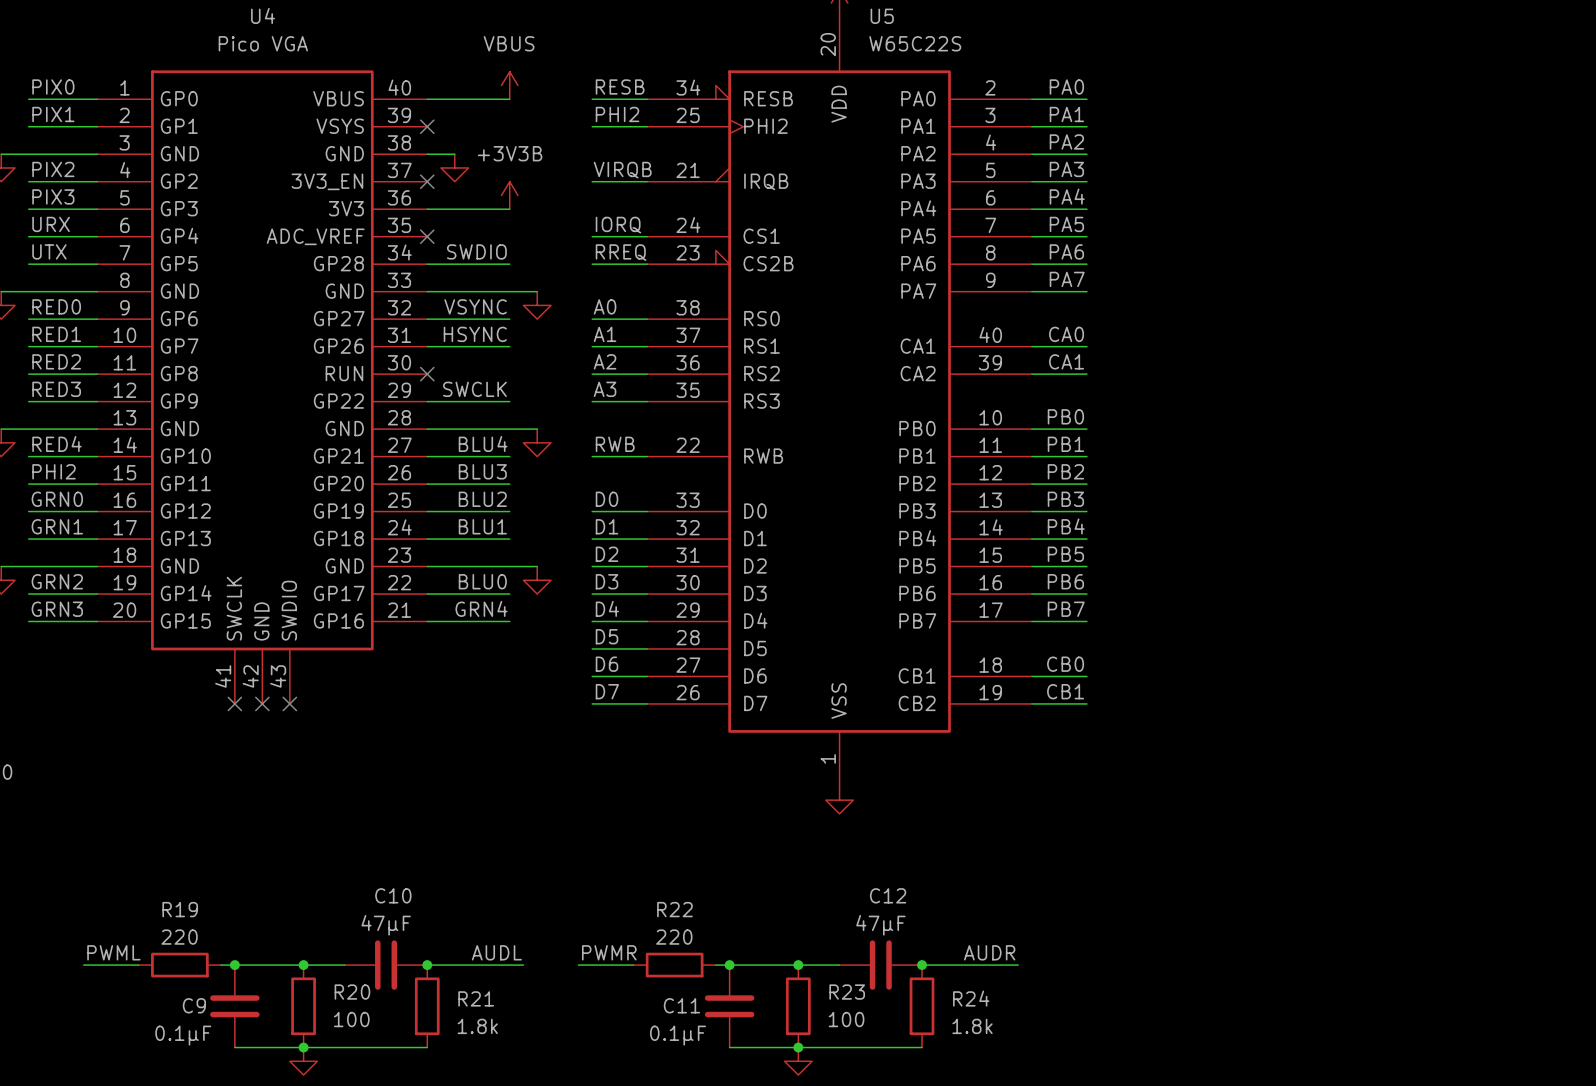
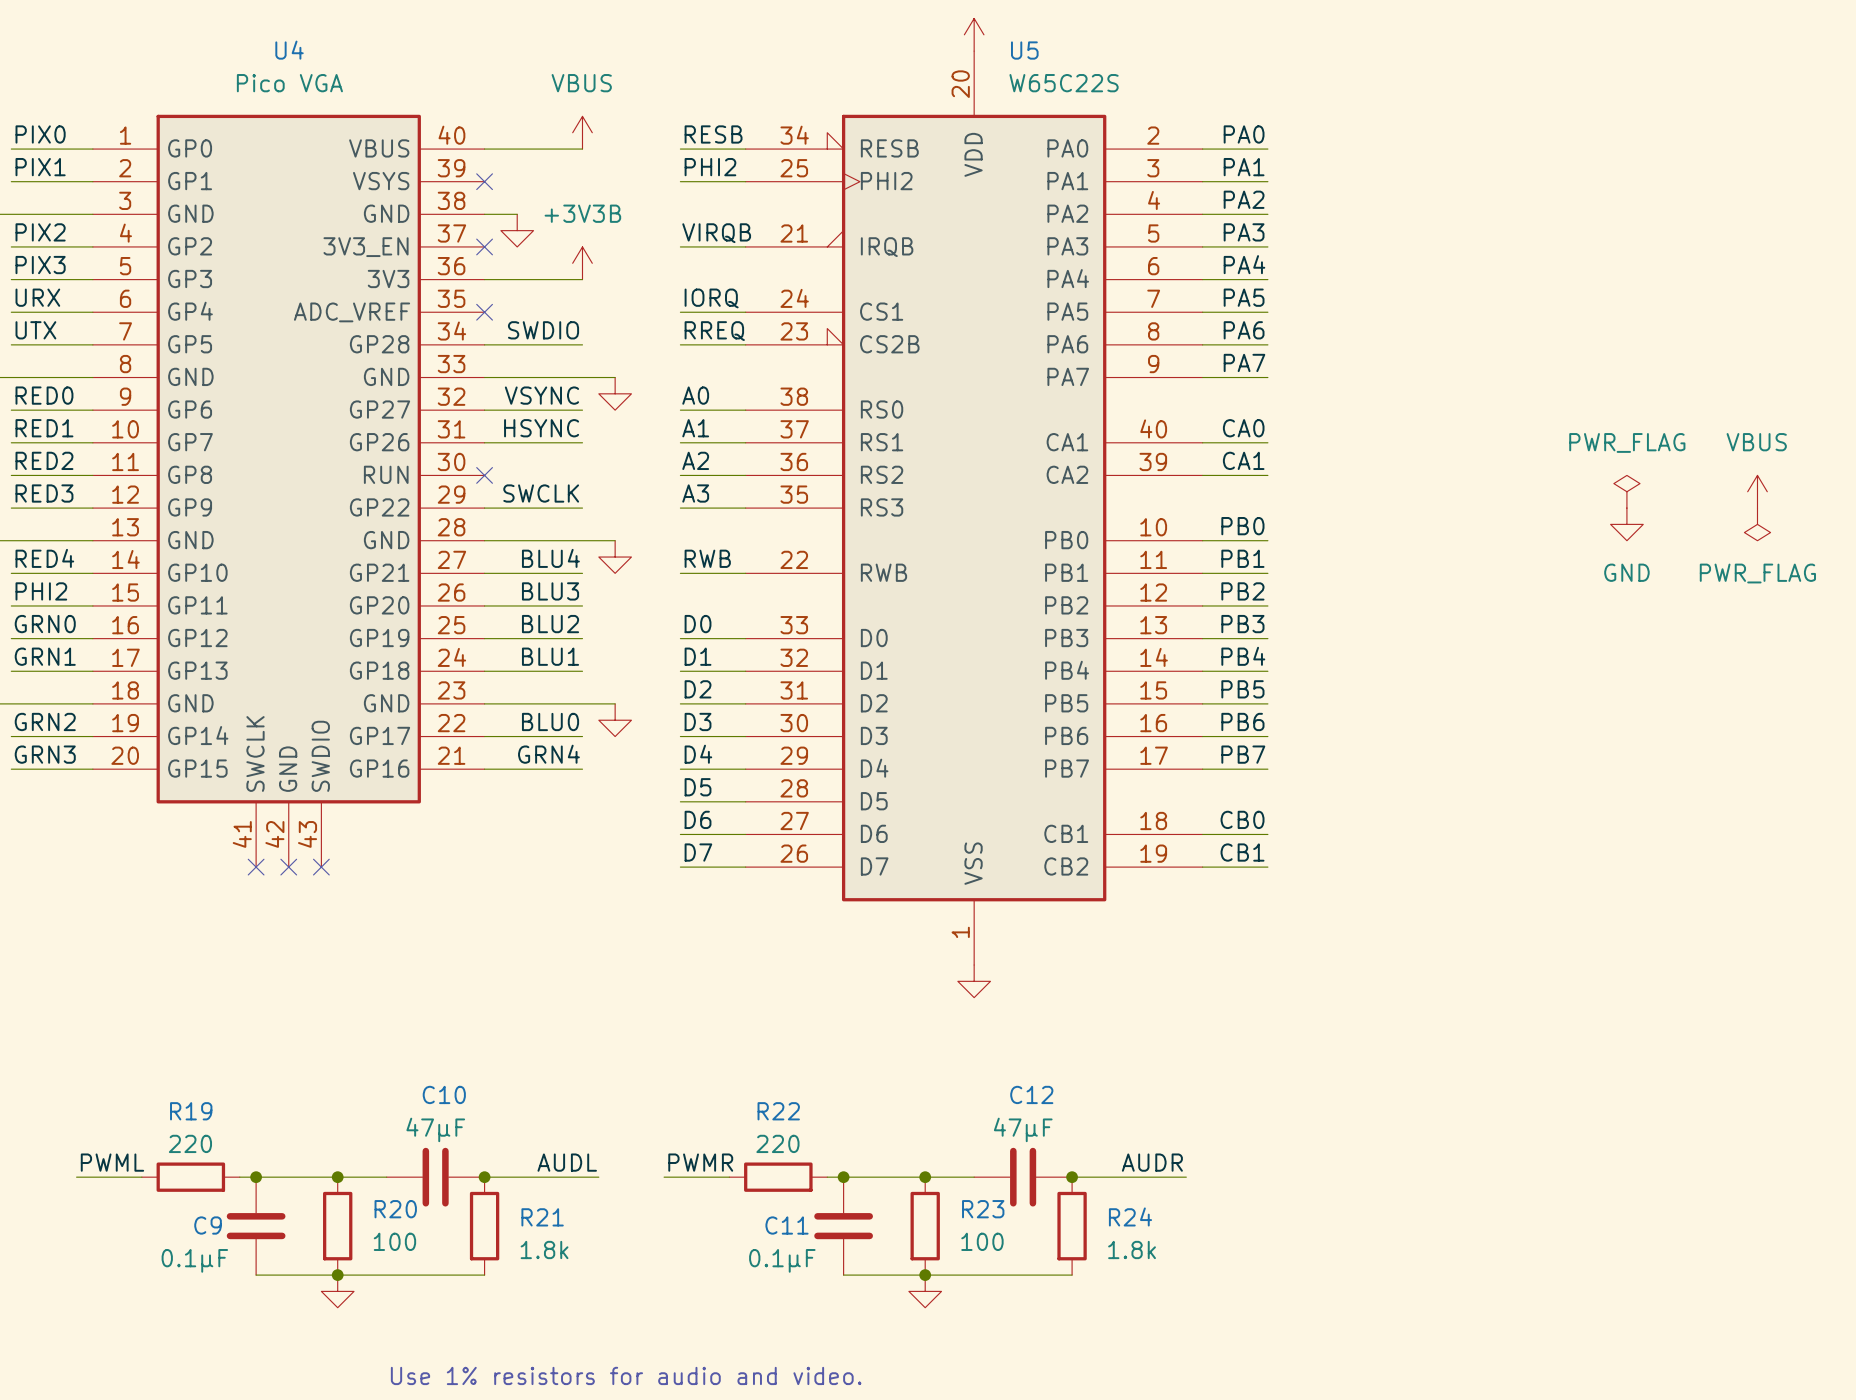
power symbol: none -> PWR_FLAG (1626, 491)
power symbol: none -> VBUS (1757, 491)
power symbol: none -> GND (1626, 524)
power symbol: none -> PWR_FLAG (1757, 524)

